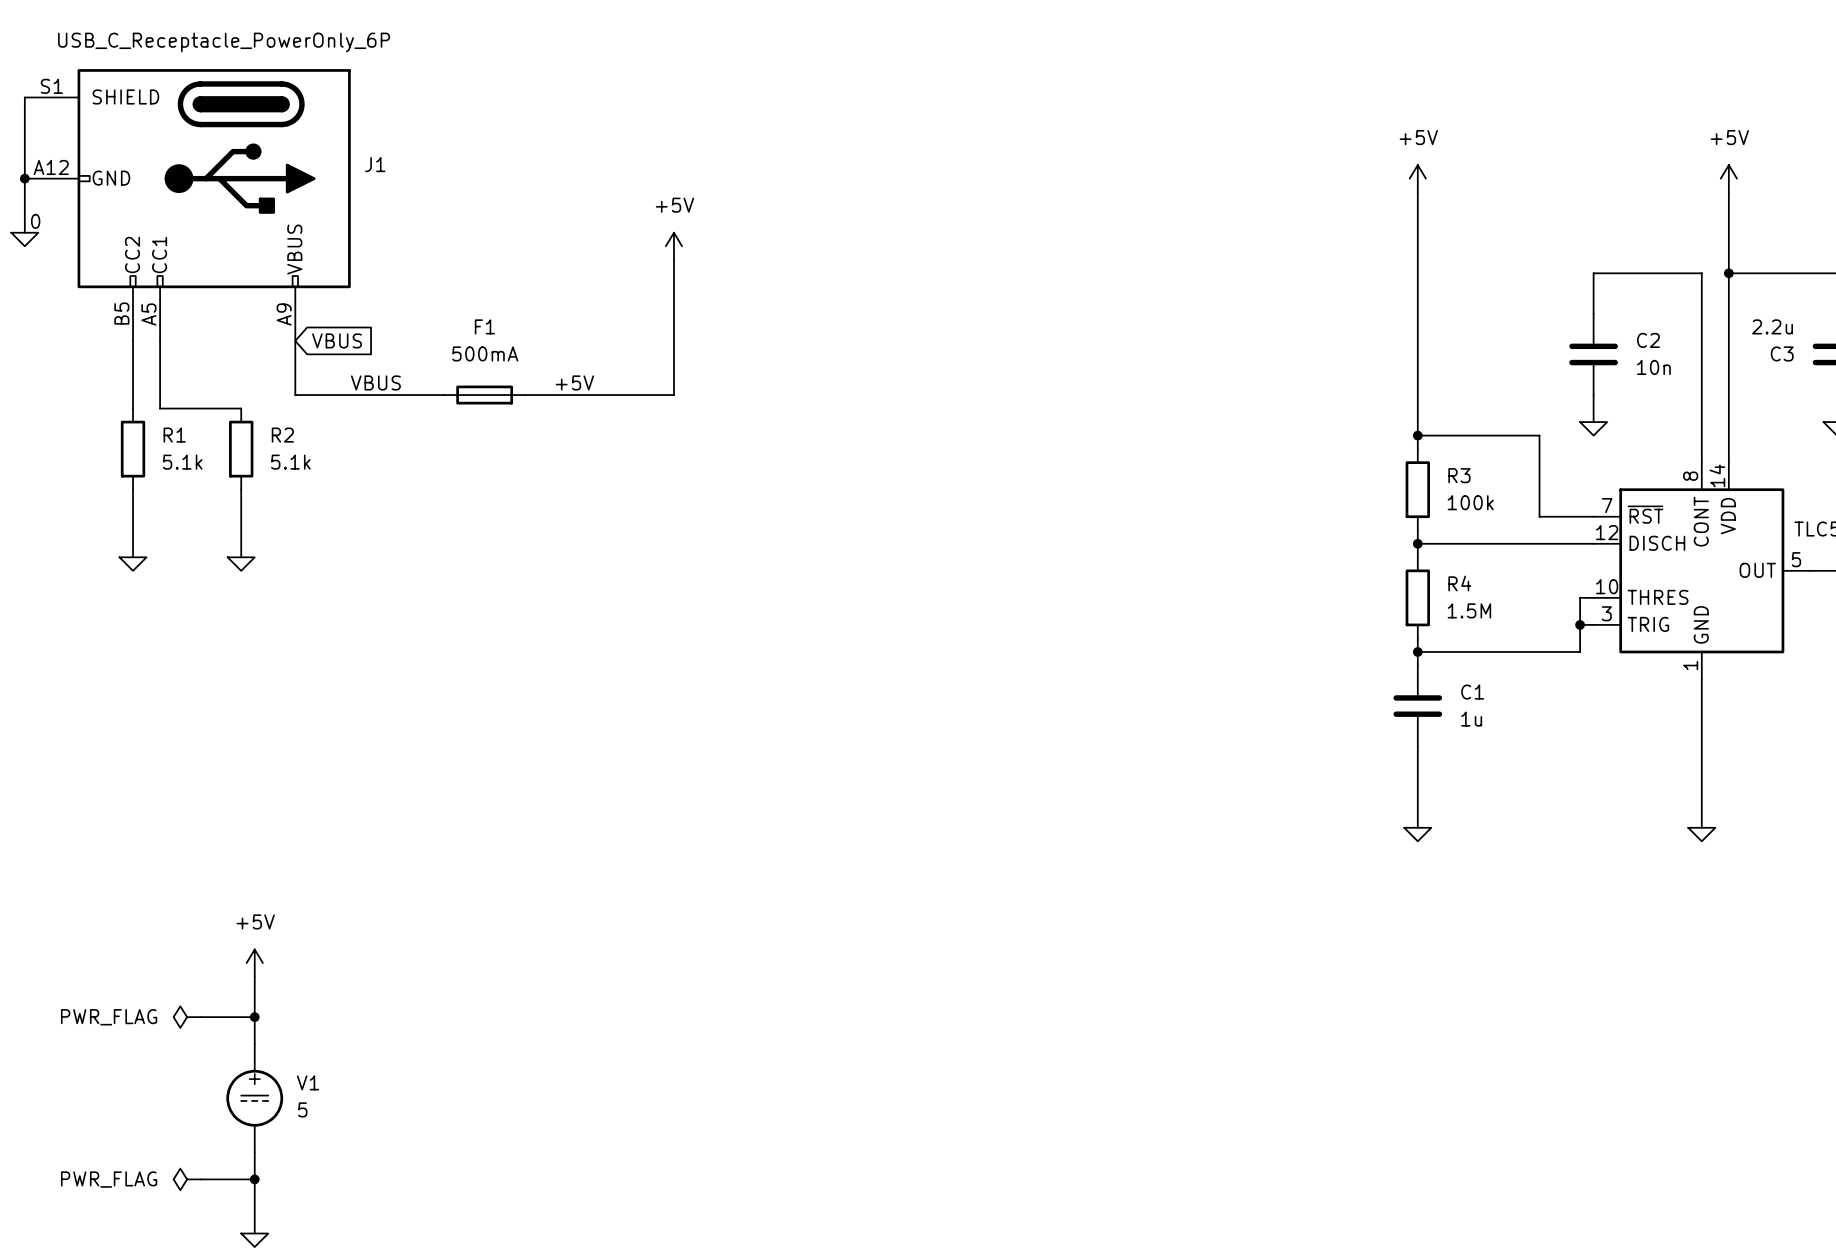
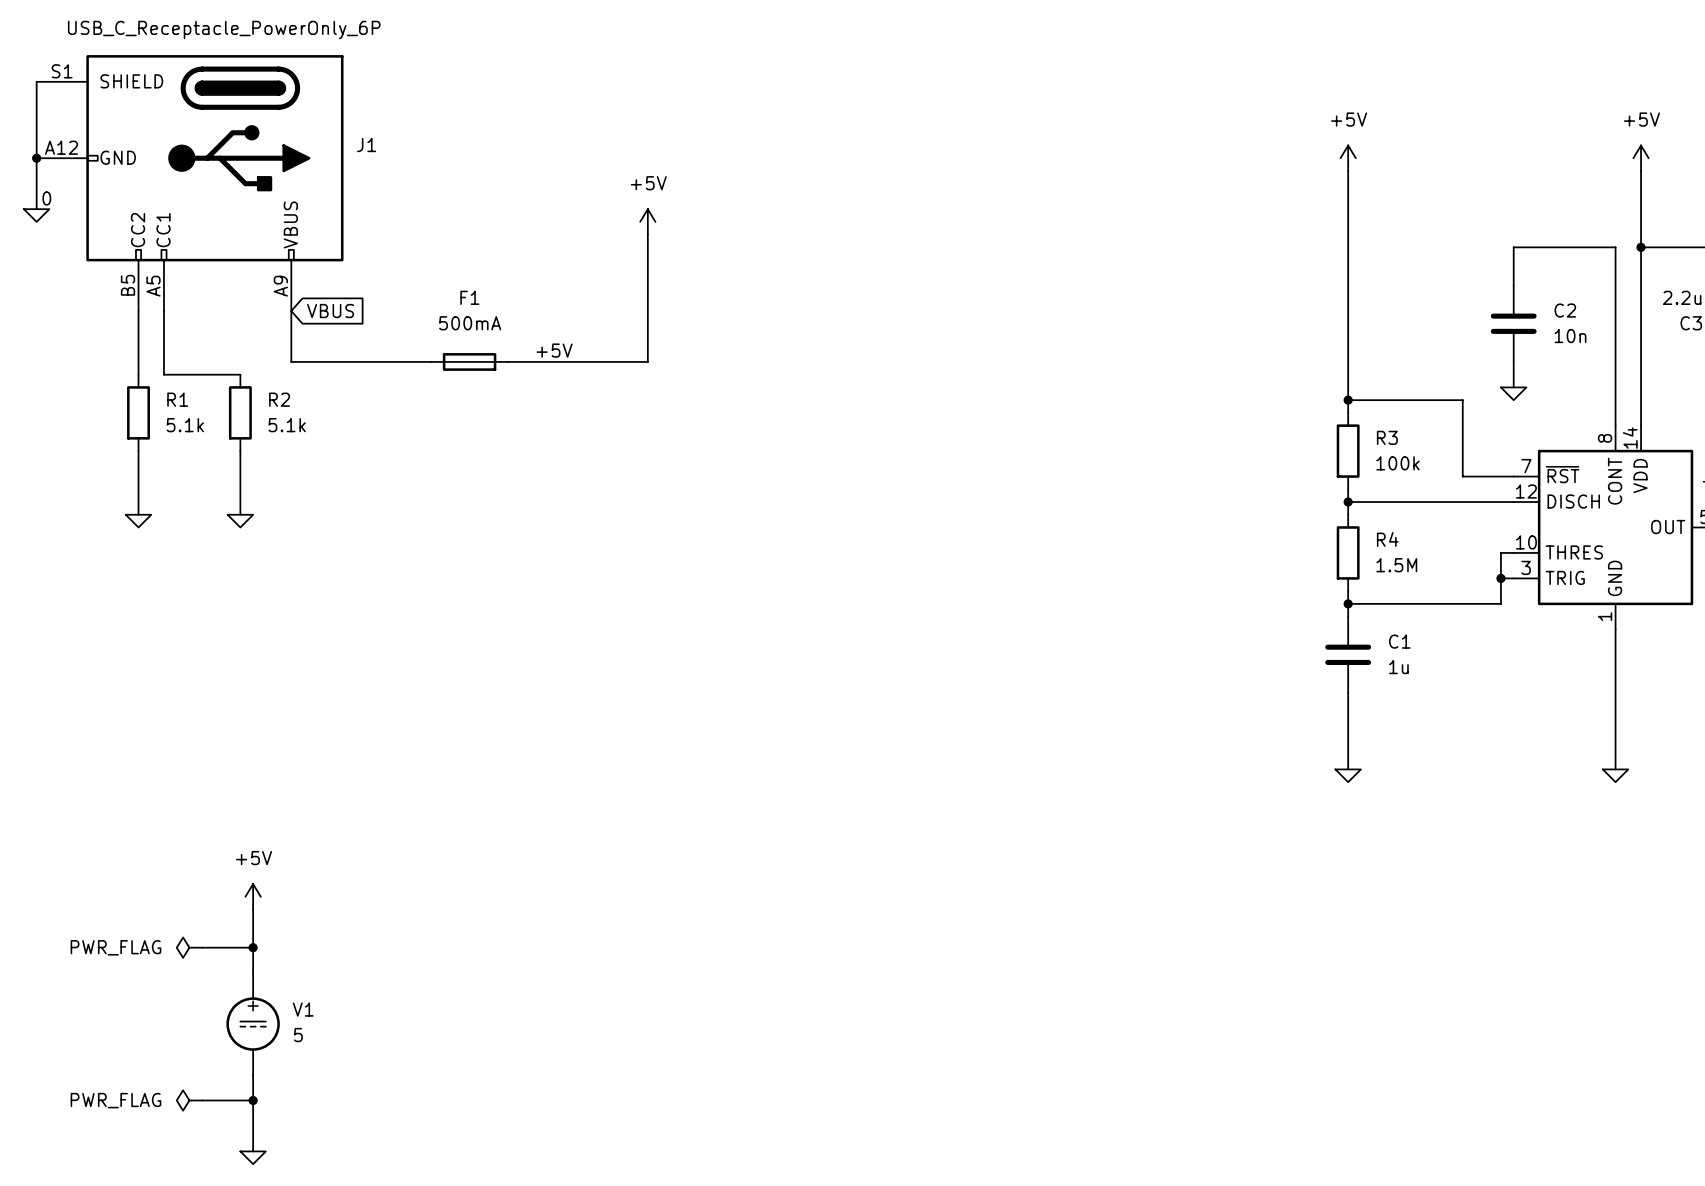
label: VBUS (375, 382) -> none

